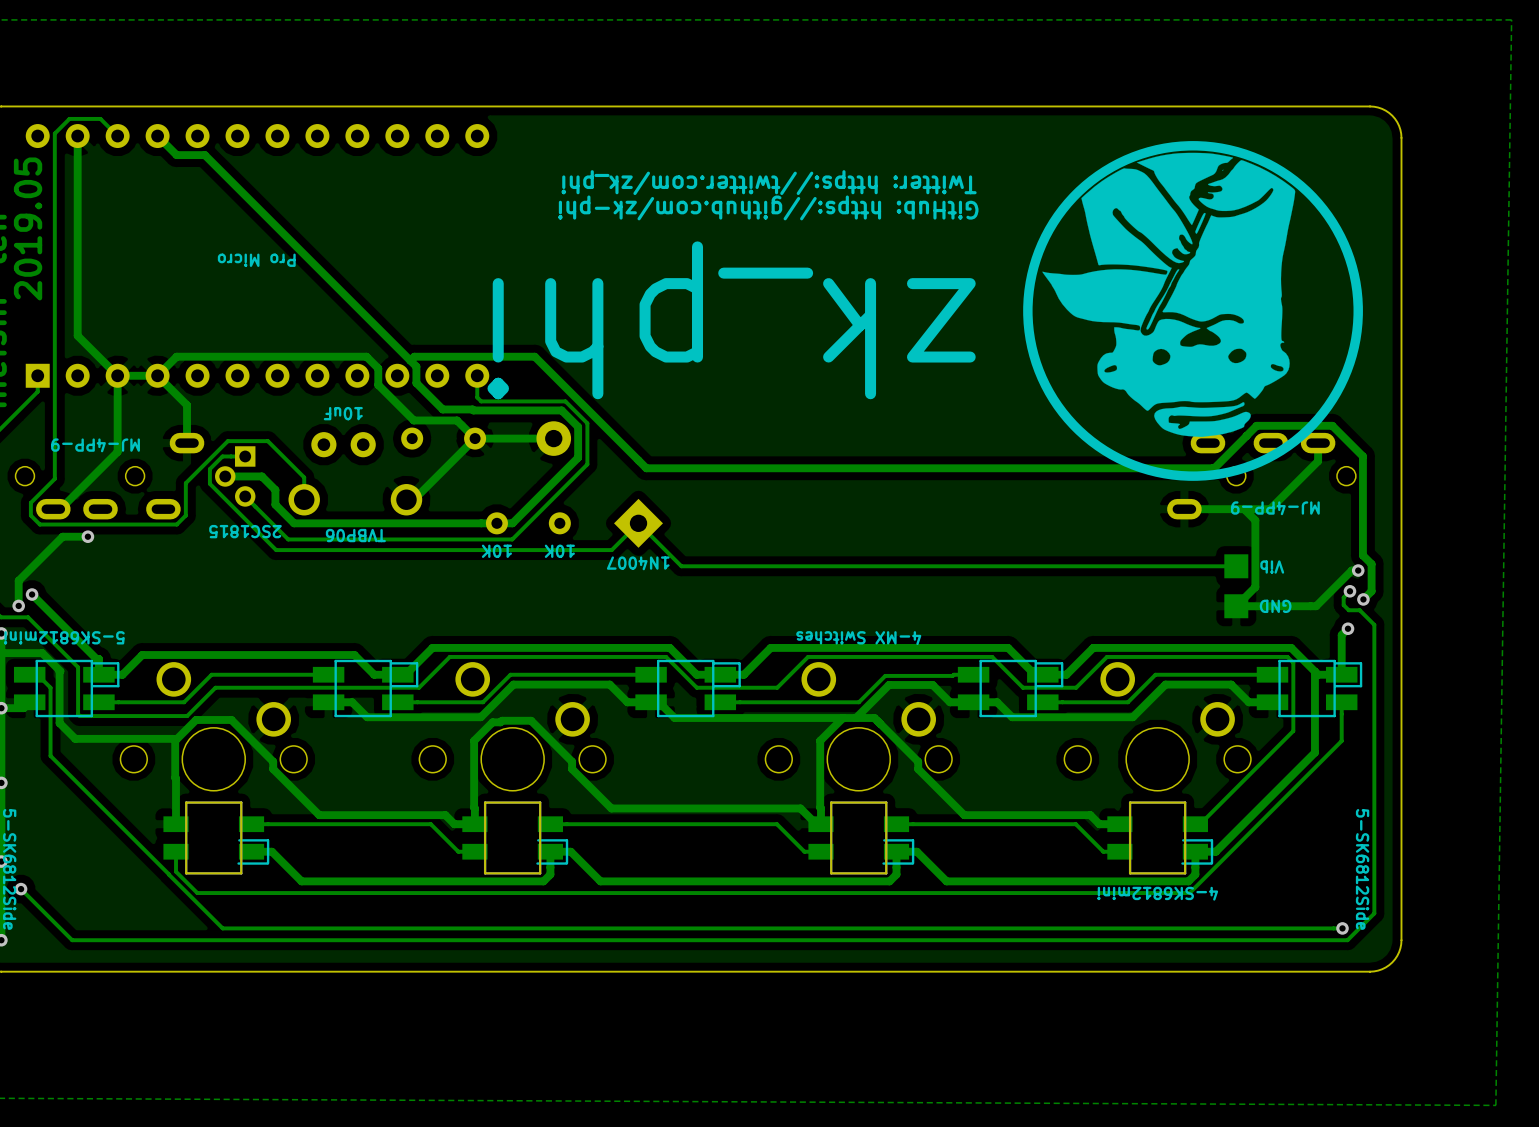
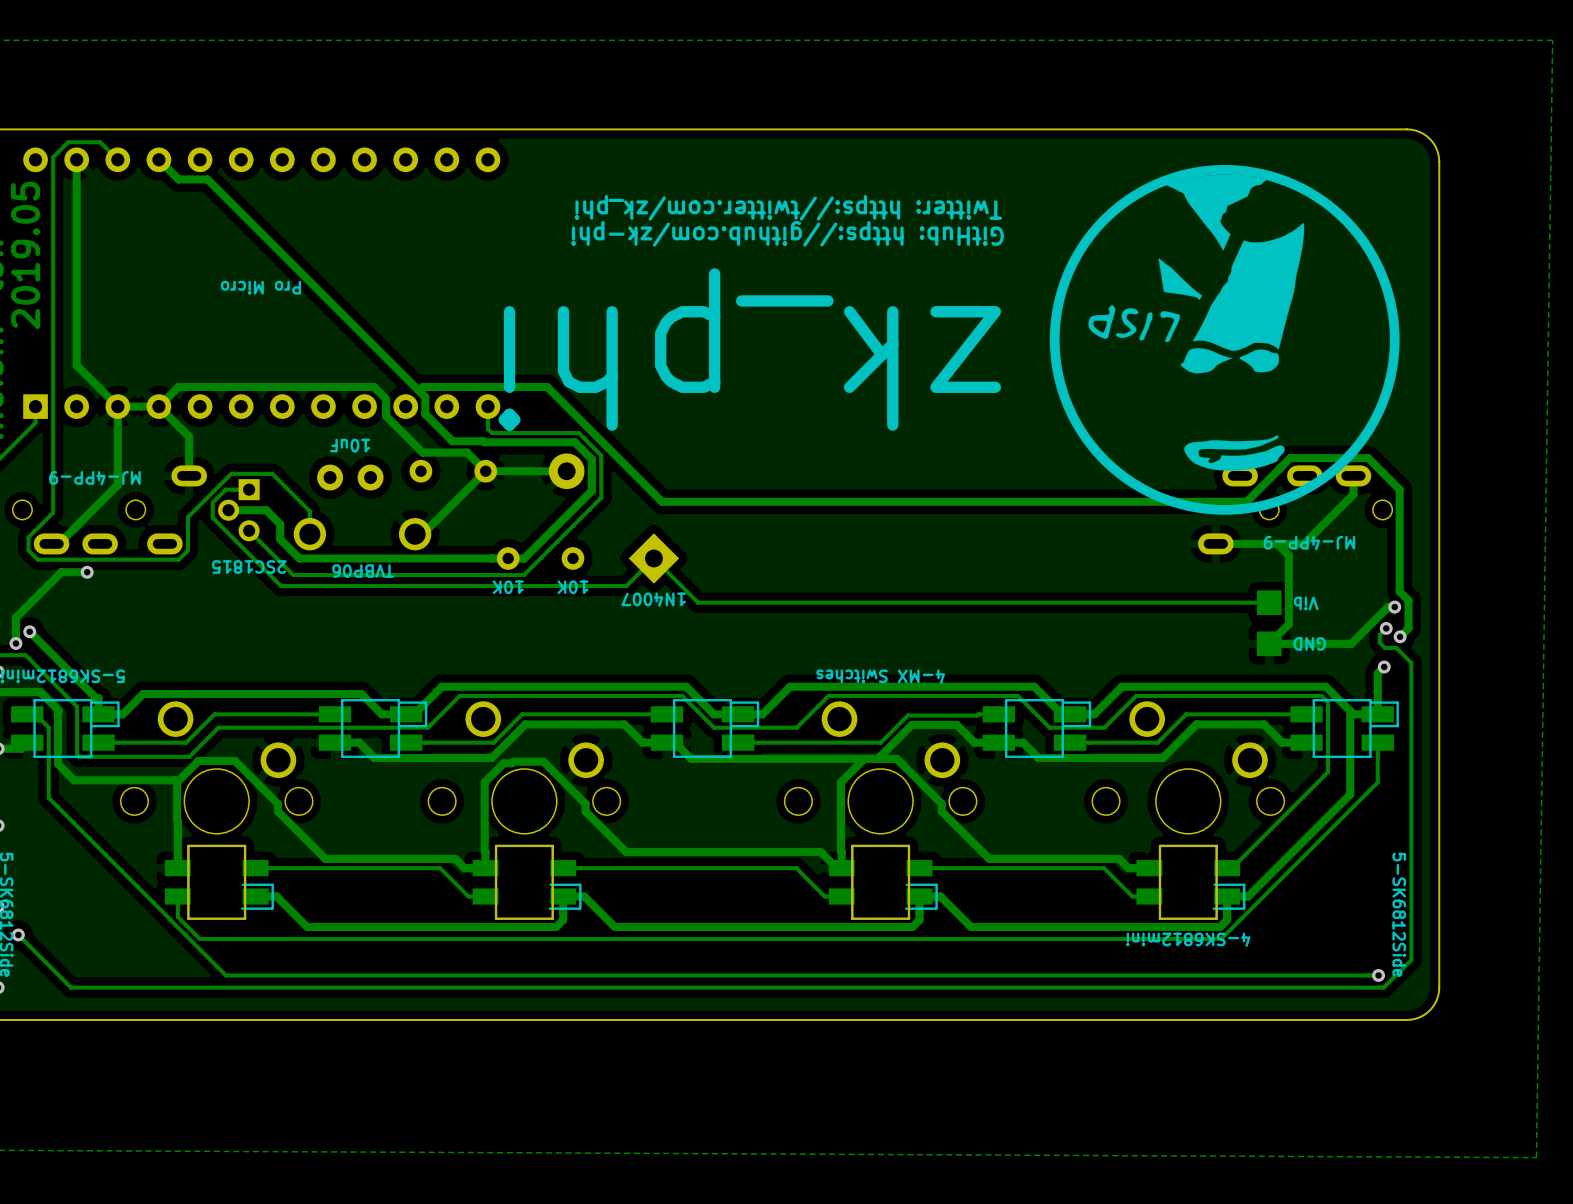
drawing shape: [1042, 152, 1296, 437] -> [1088, 174, 1305, 471]

